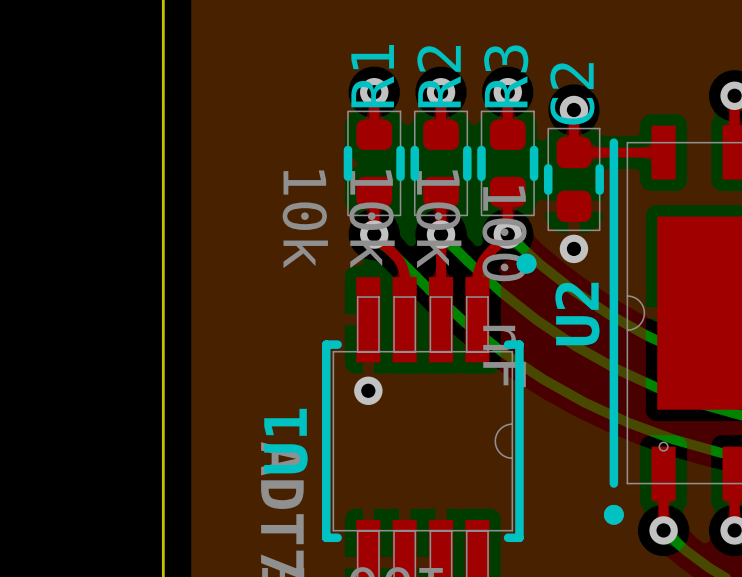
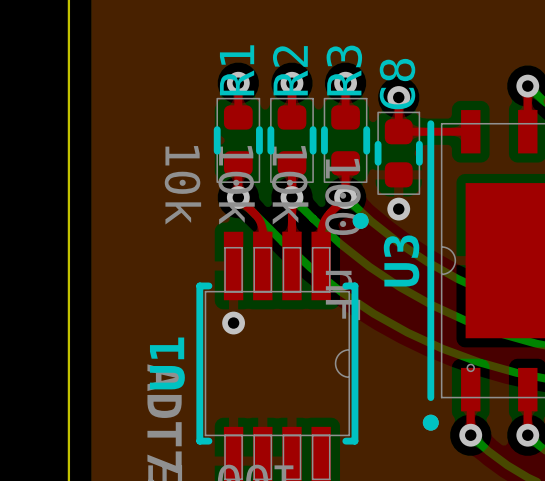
C2 name: C2 (572, 93) -> C8 (397, 84)
U2 name: U2 (577, 314) -> U3 (401, 260)

